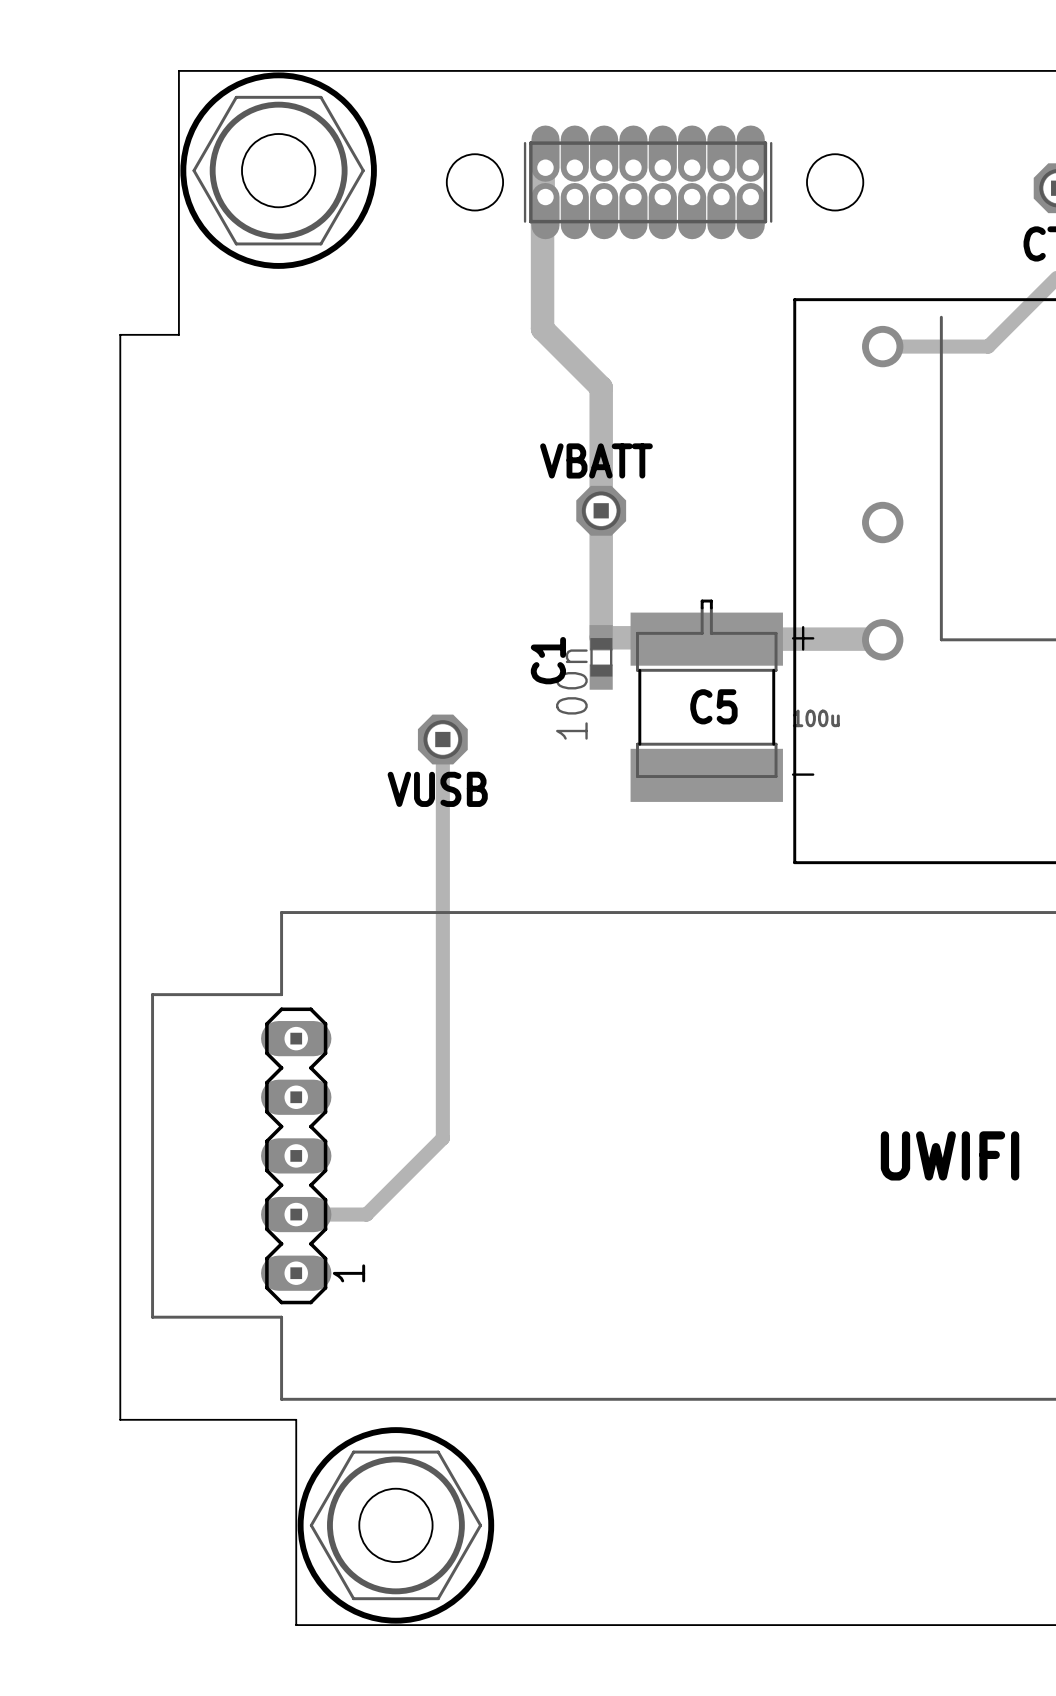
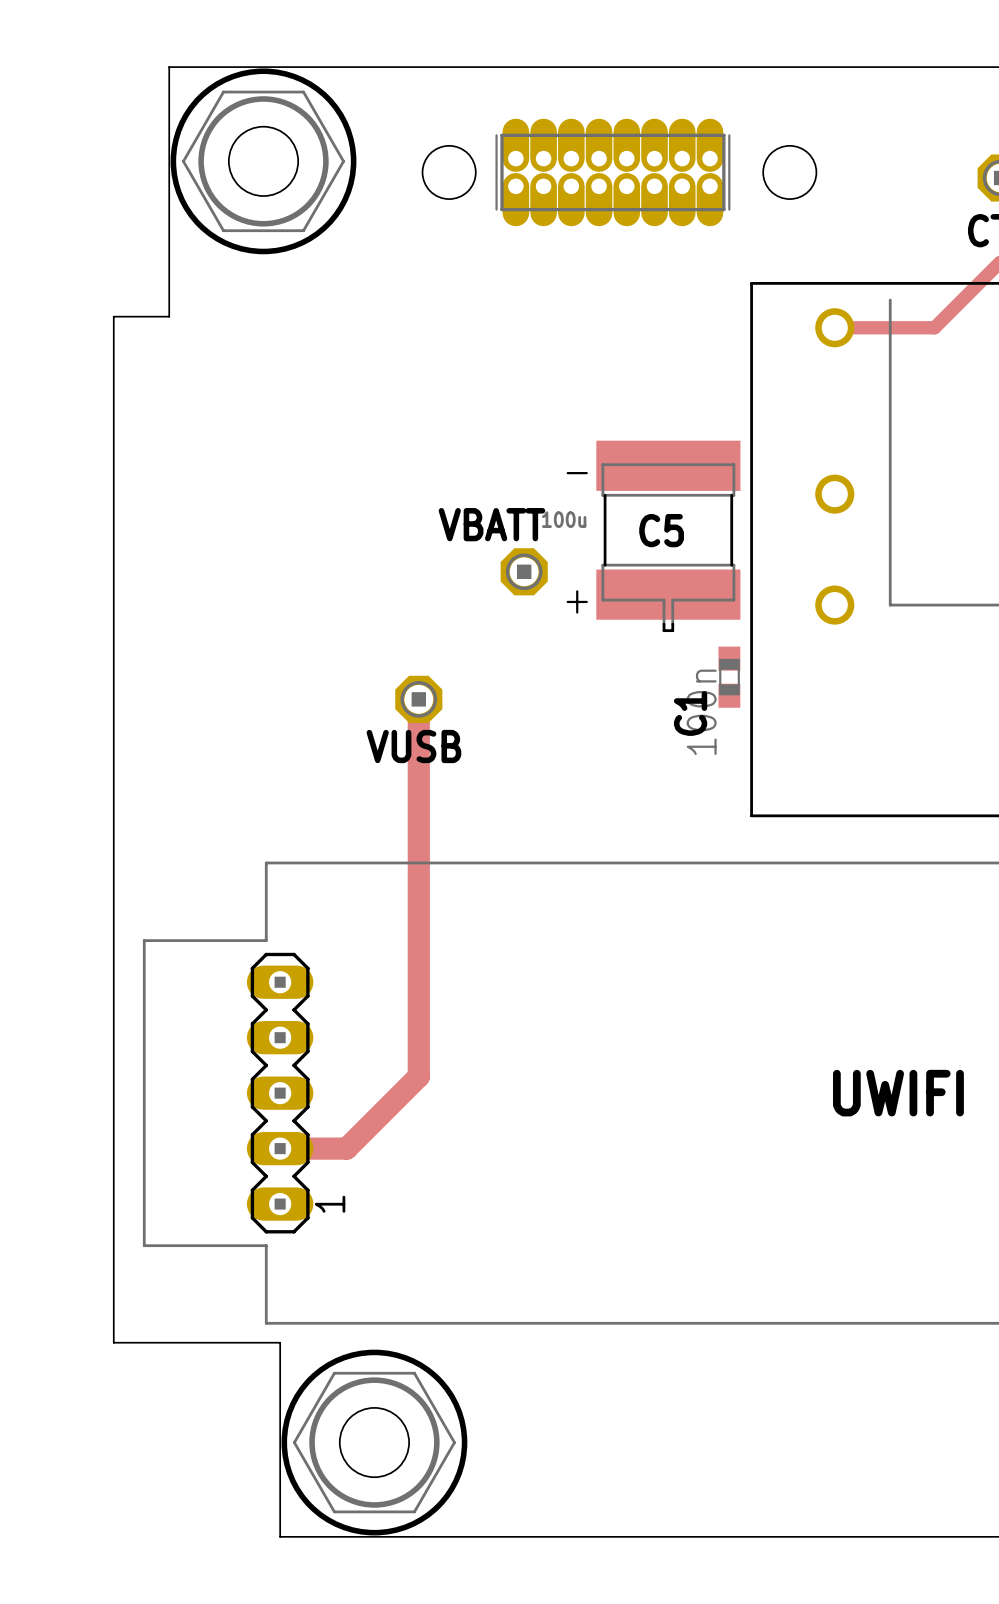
track: (545, 167) (545, 197) (542, 173) (542, 328) (601, 387) (601, 637) (882, 639) -> none
VBATT name position: VBATT (596, 460) -> VBATT (491, 524)
VBATT position: (601, 510) -> (524, 571)
C5 footprint: [630, 599, 783, 802] -> [596, 440, 741, 633]
C1 position: (601, 657) -> (729, 677)
C1 name position: C1 (548, 660) -> C1 (690, 713)
C5 value position: 100u (816, 718) -> 100u (564, 519)
track width: thin (442, 739) (442, 1138) (366, 1214) (296, 1214) -> thick (418, 699) (418, 1076) (346, 1148) (280, 1148)

